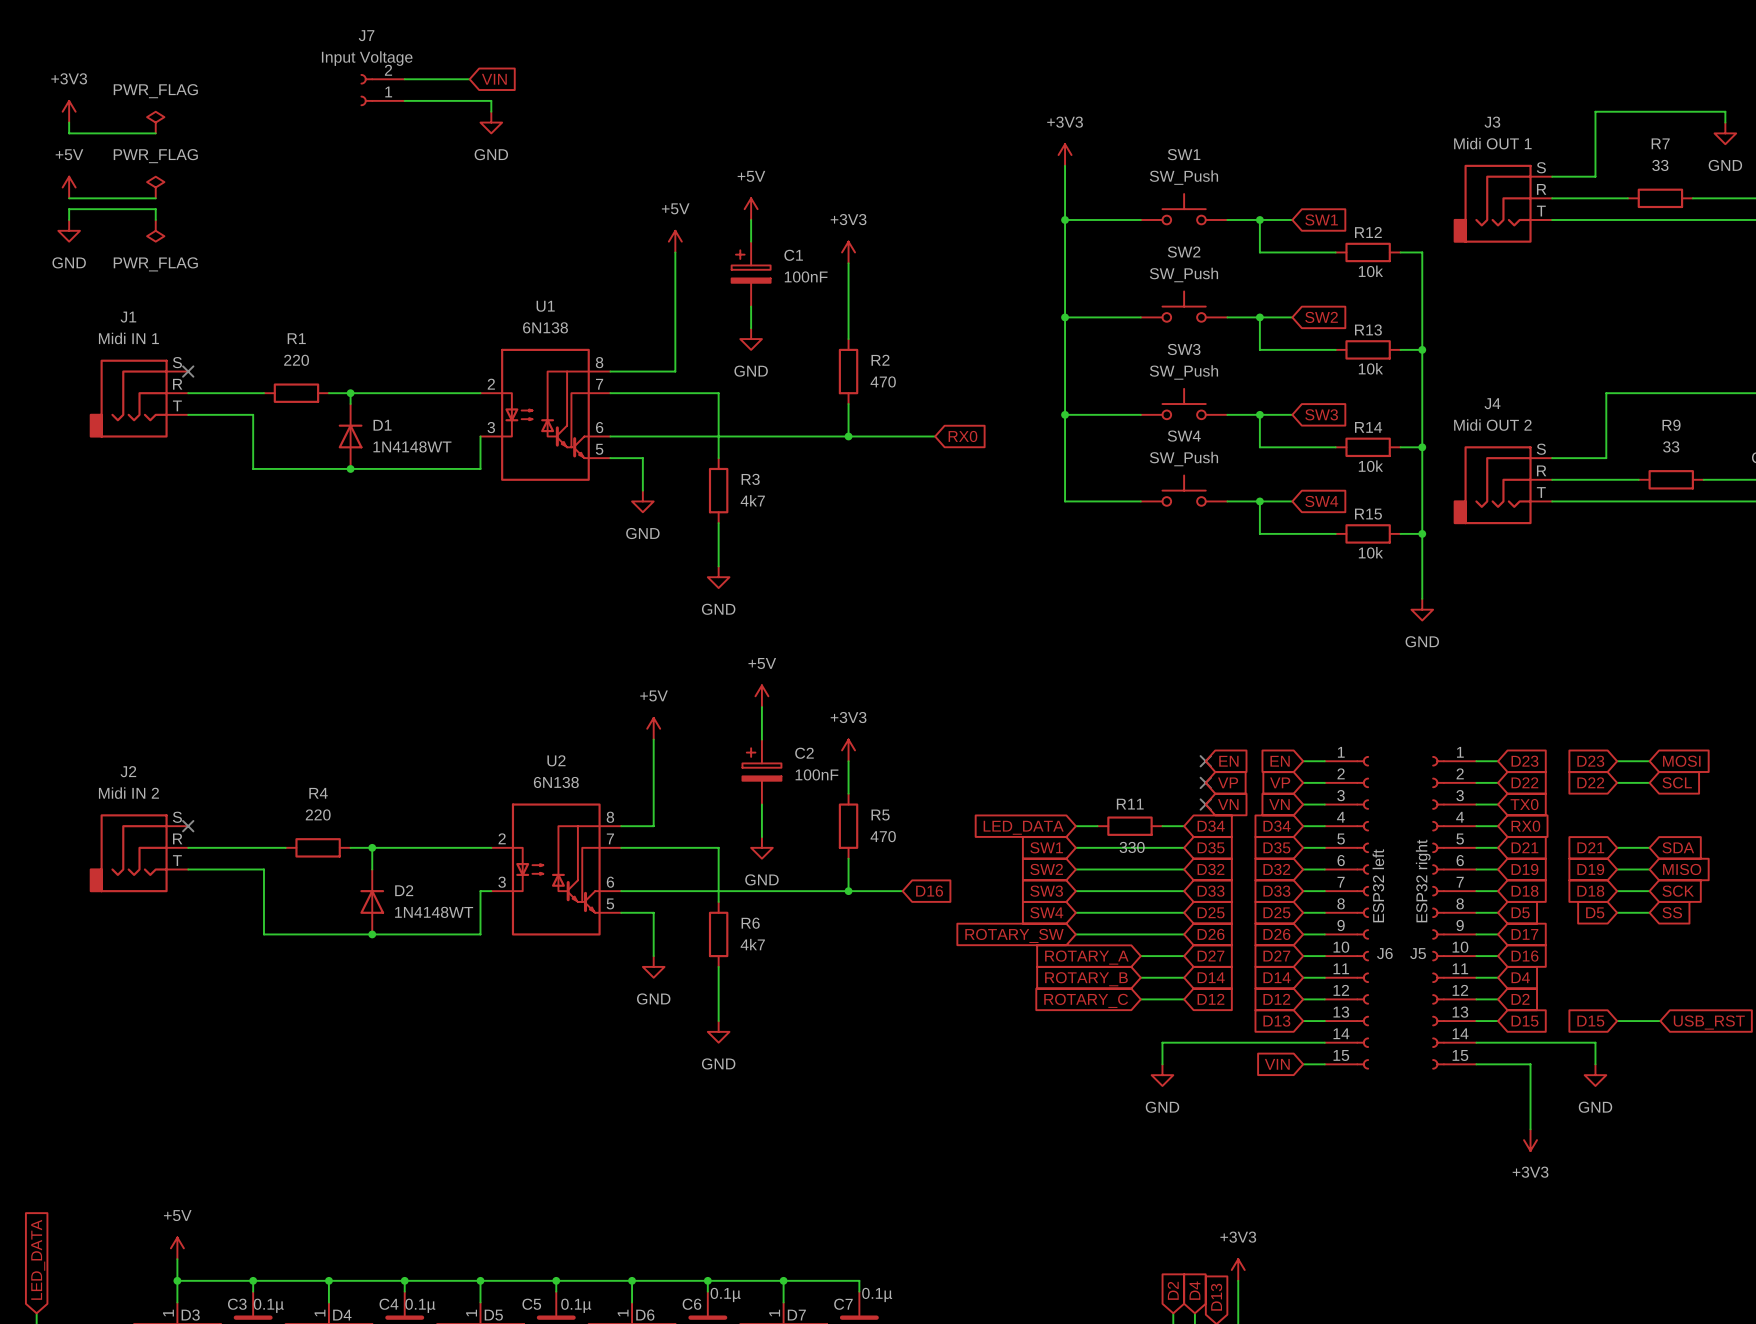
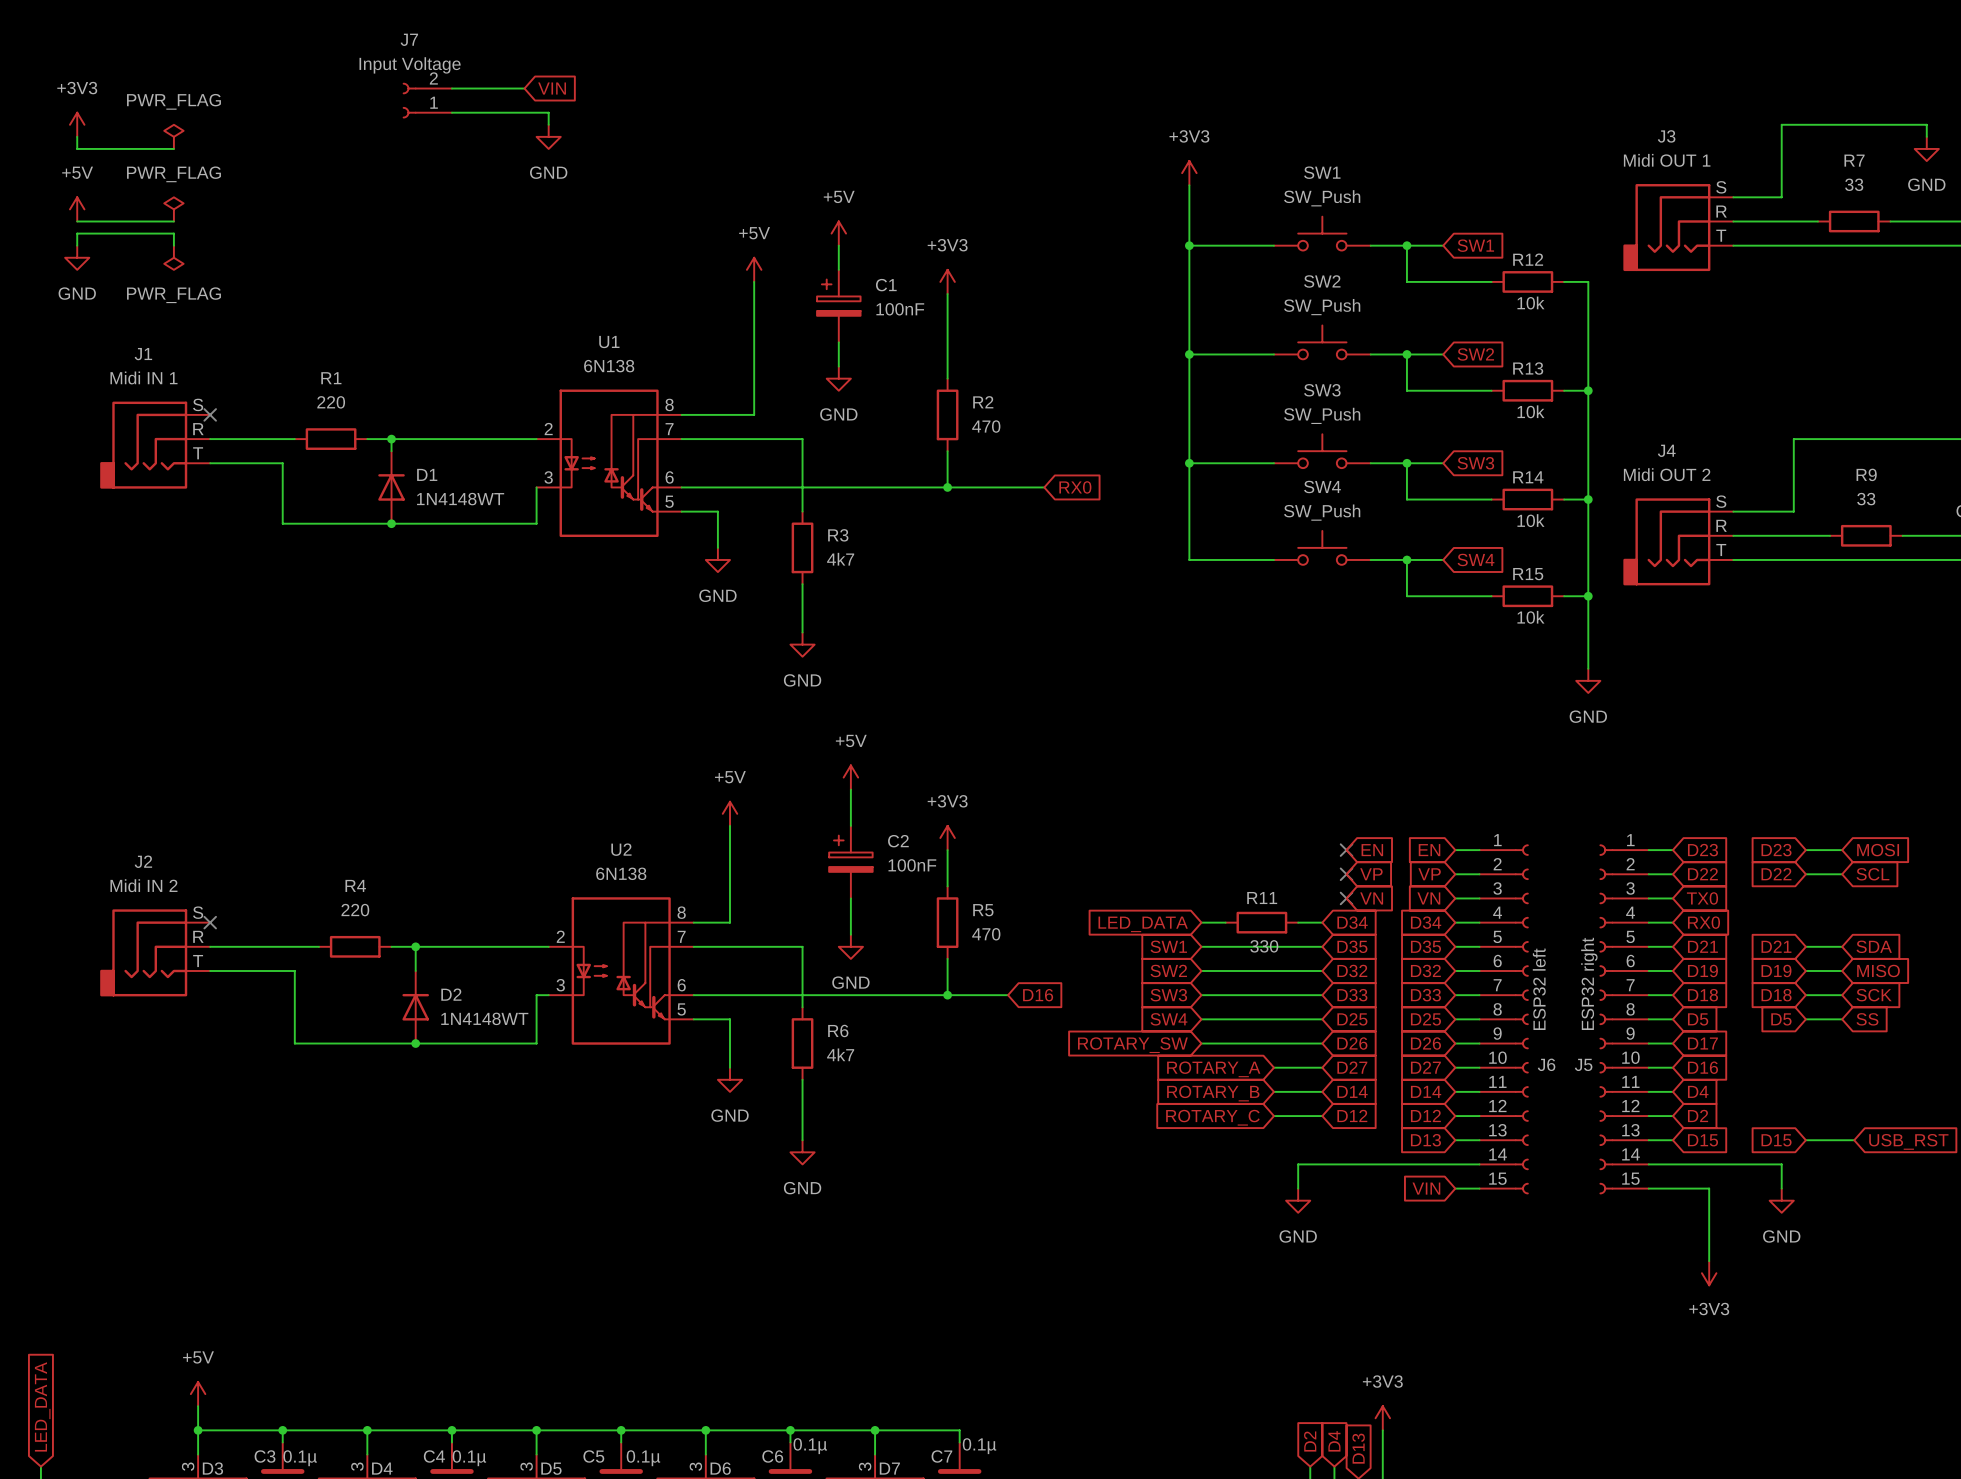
D3 pin number: 1 (168, 1313) -> 3 (188, 1466)
D4 pin number: 1 (320, 1313) -> 3 (357, 1466)
D5 pin number: 1 (471, 1313) -> 3 (526, 1466)
D6 pin number: 1 (623, 1313) -> 3 (695, 1466)
D7 pin number: 1 (774, 1313) -> 3 (865, 1466)

